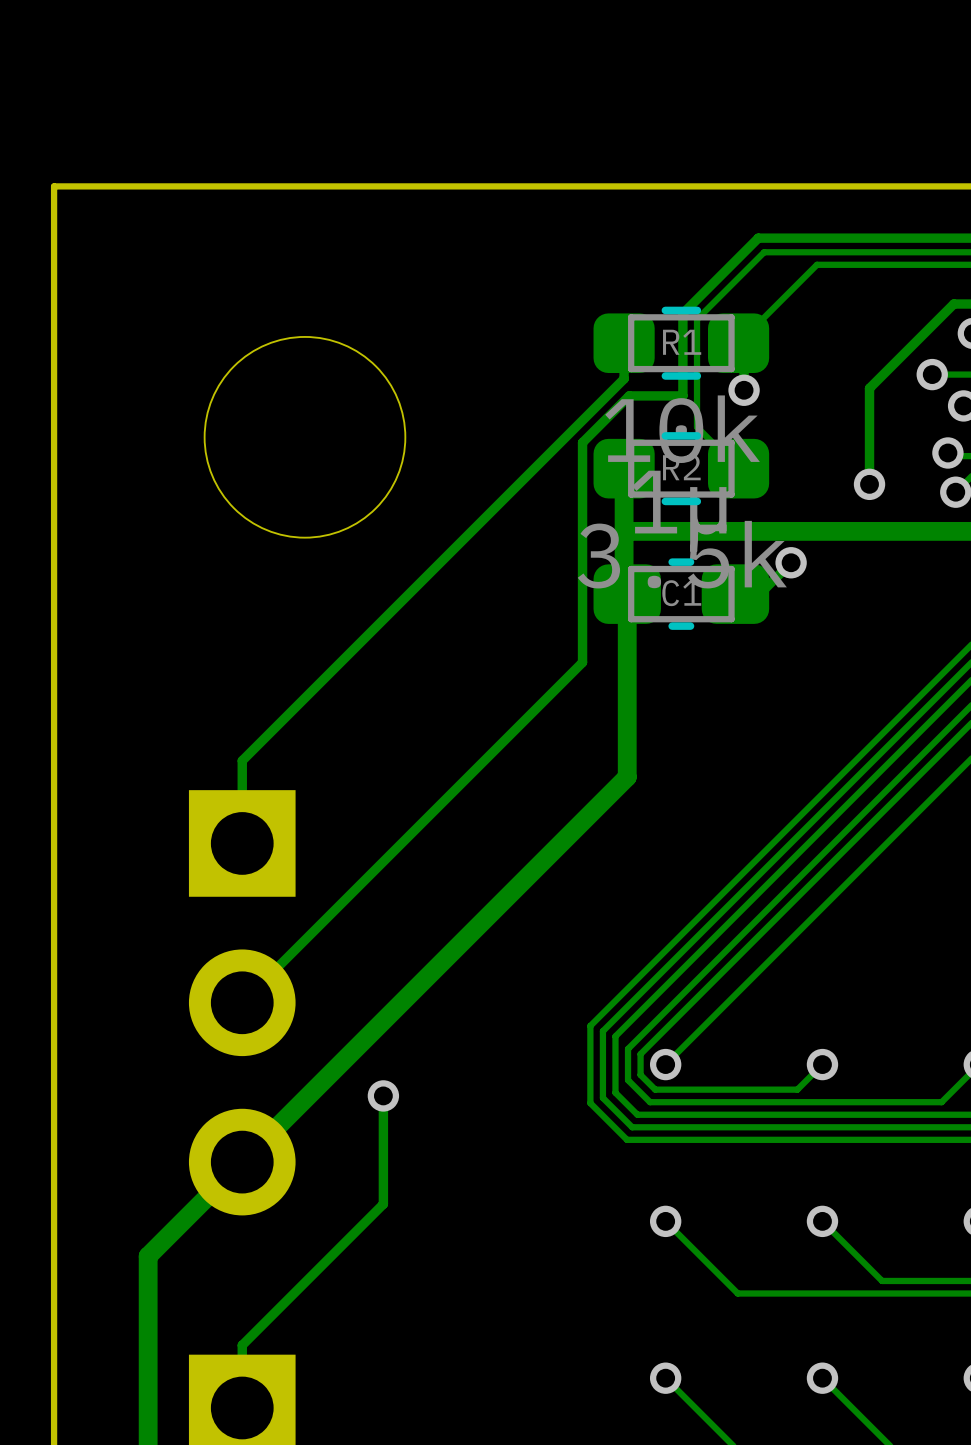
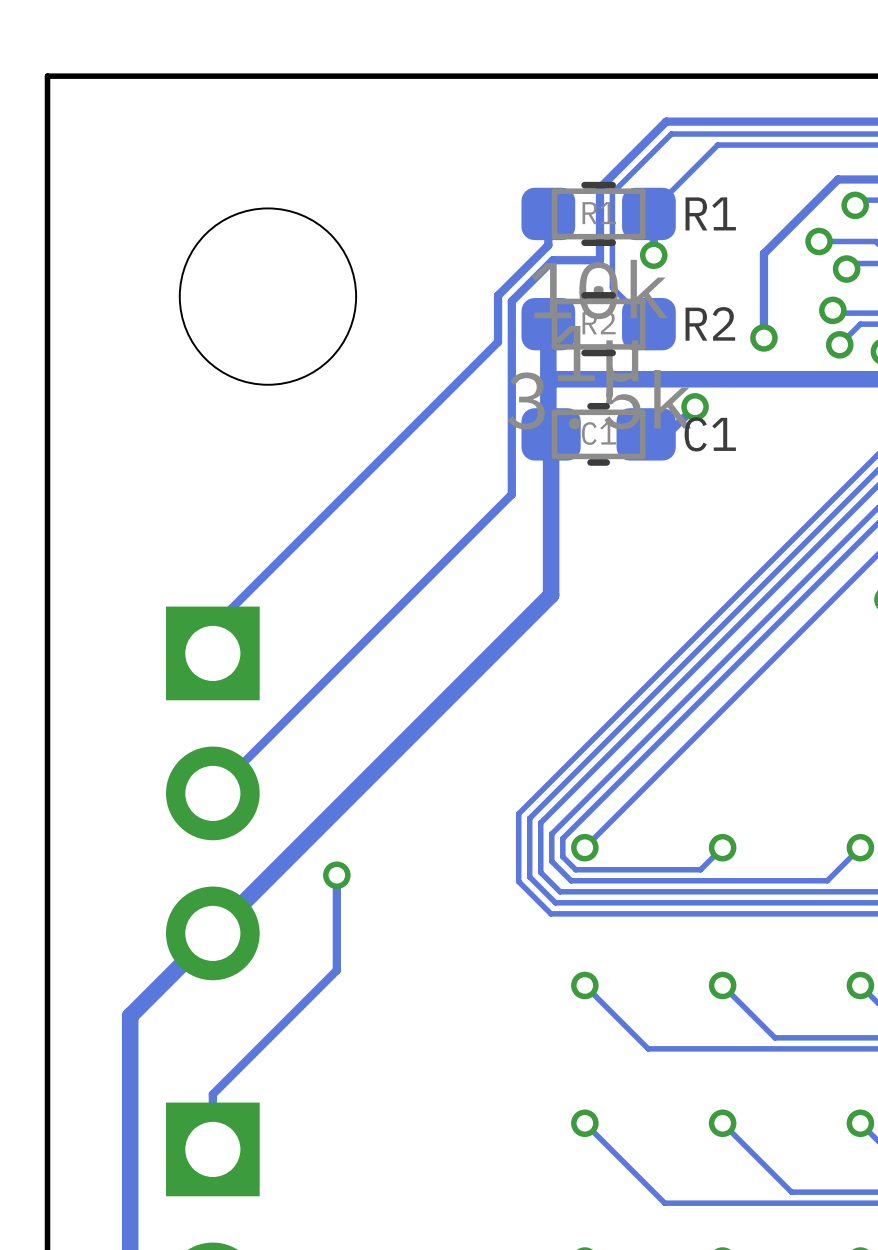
text: none -> R1 (710, 213)
track: (566, 436) (242, 760) (242, 813) -> (498, 295) (498, 342) (212, 627)
text: none -> R2 (710, 323)
text: none -> C1 (710, 434)

